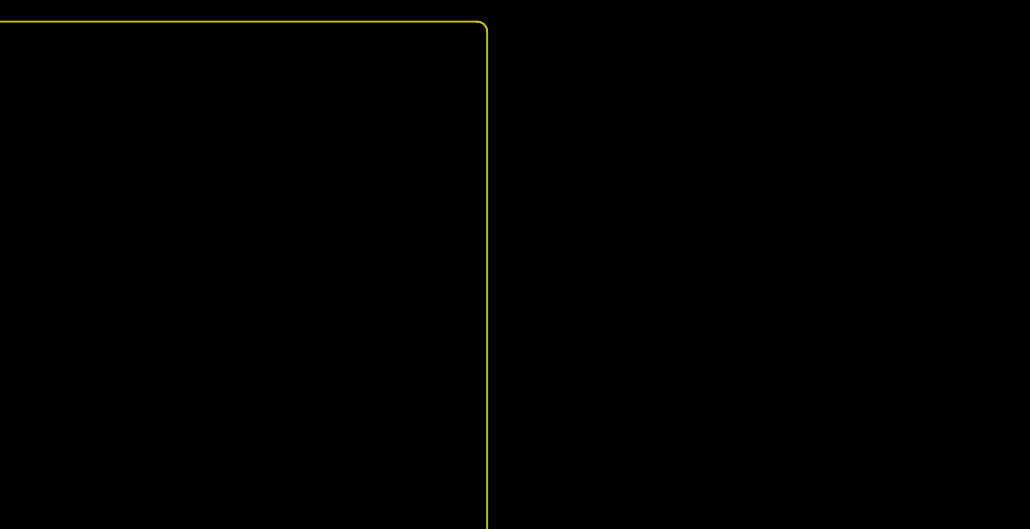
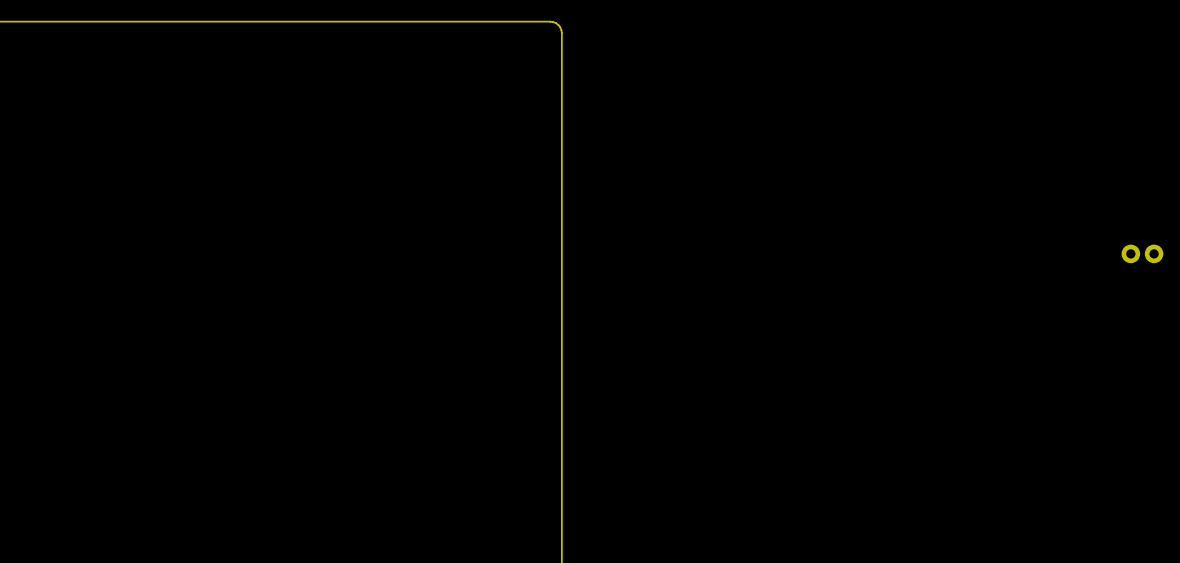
part: none -> (1142, 253)

